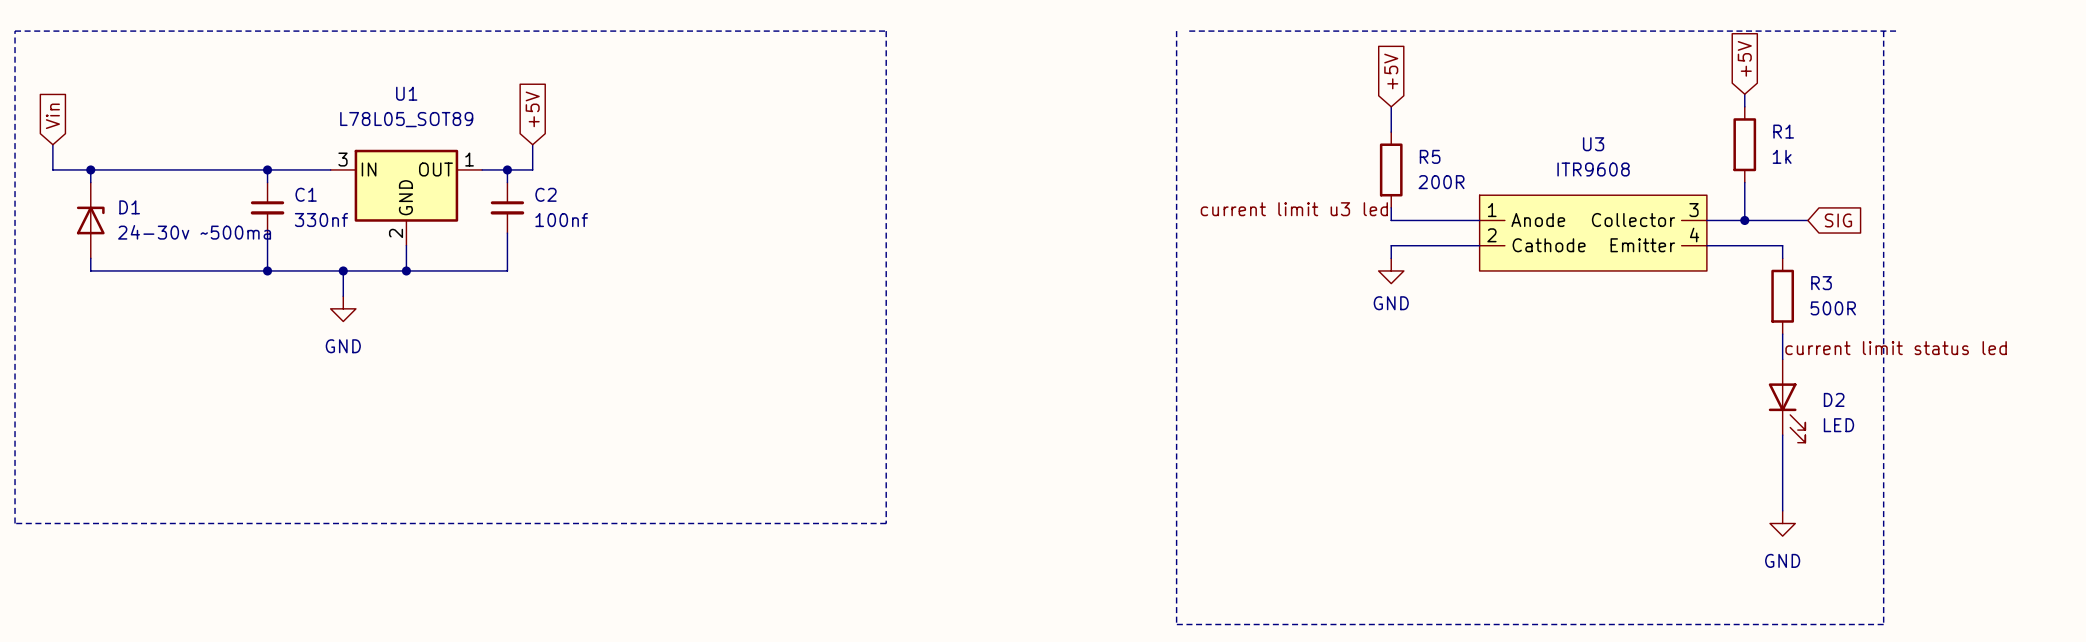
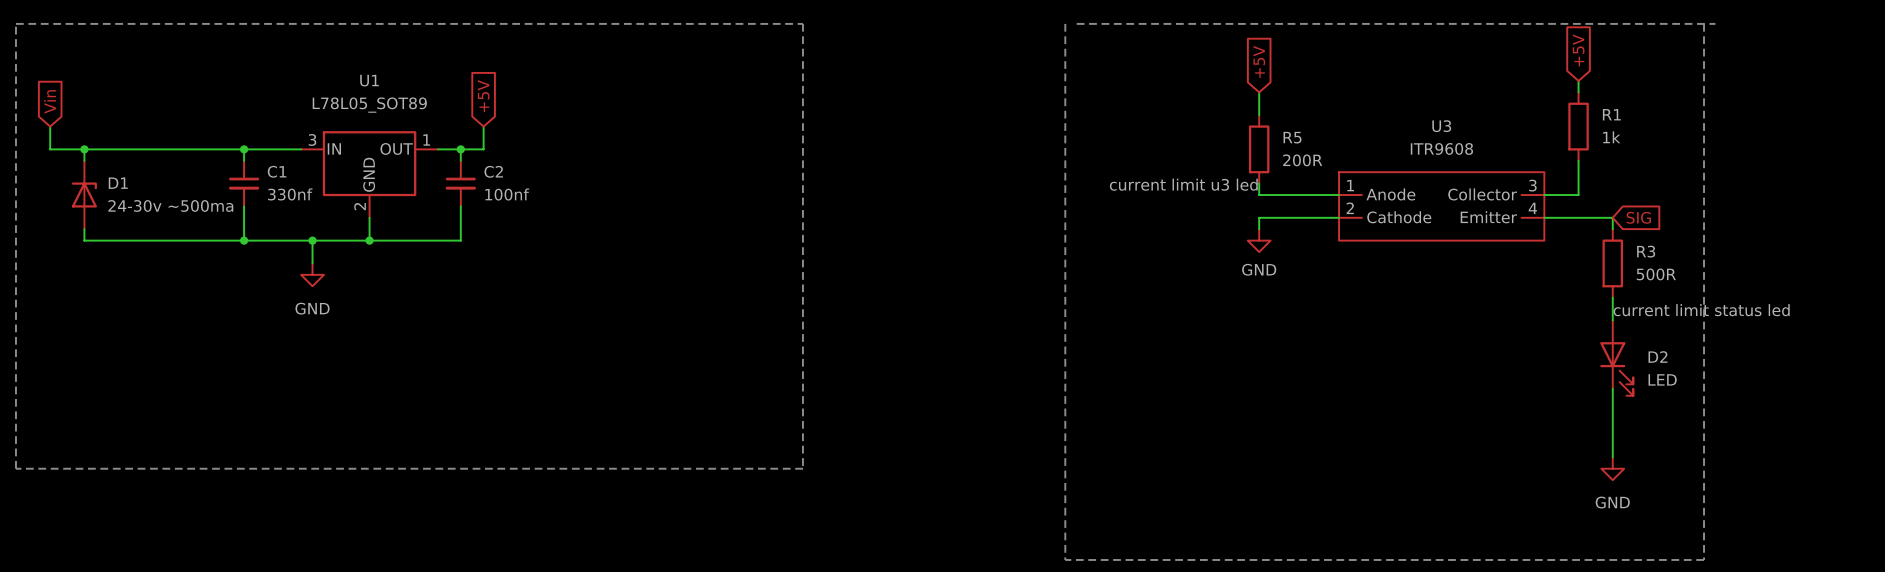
wire: (1744, 220) (1807, 220) -> none
junction: (1744, 220) -> none
global label position: SIG (1838, 220) -> SIG (1638, 217)

